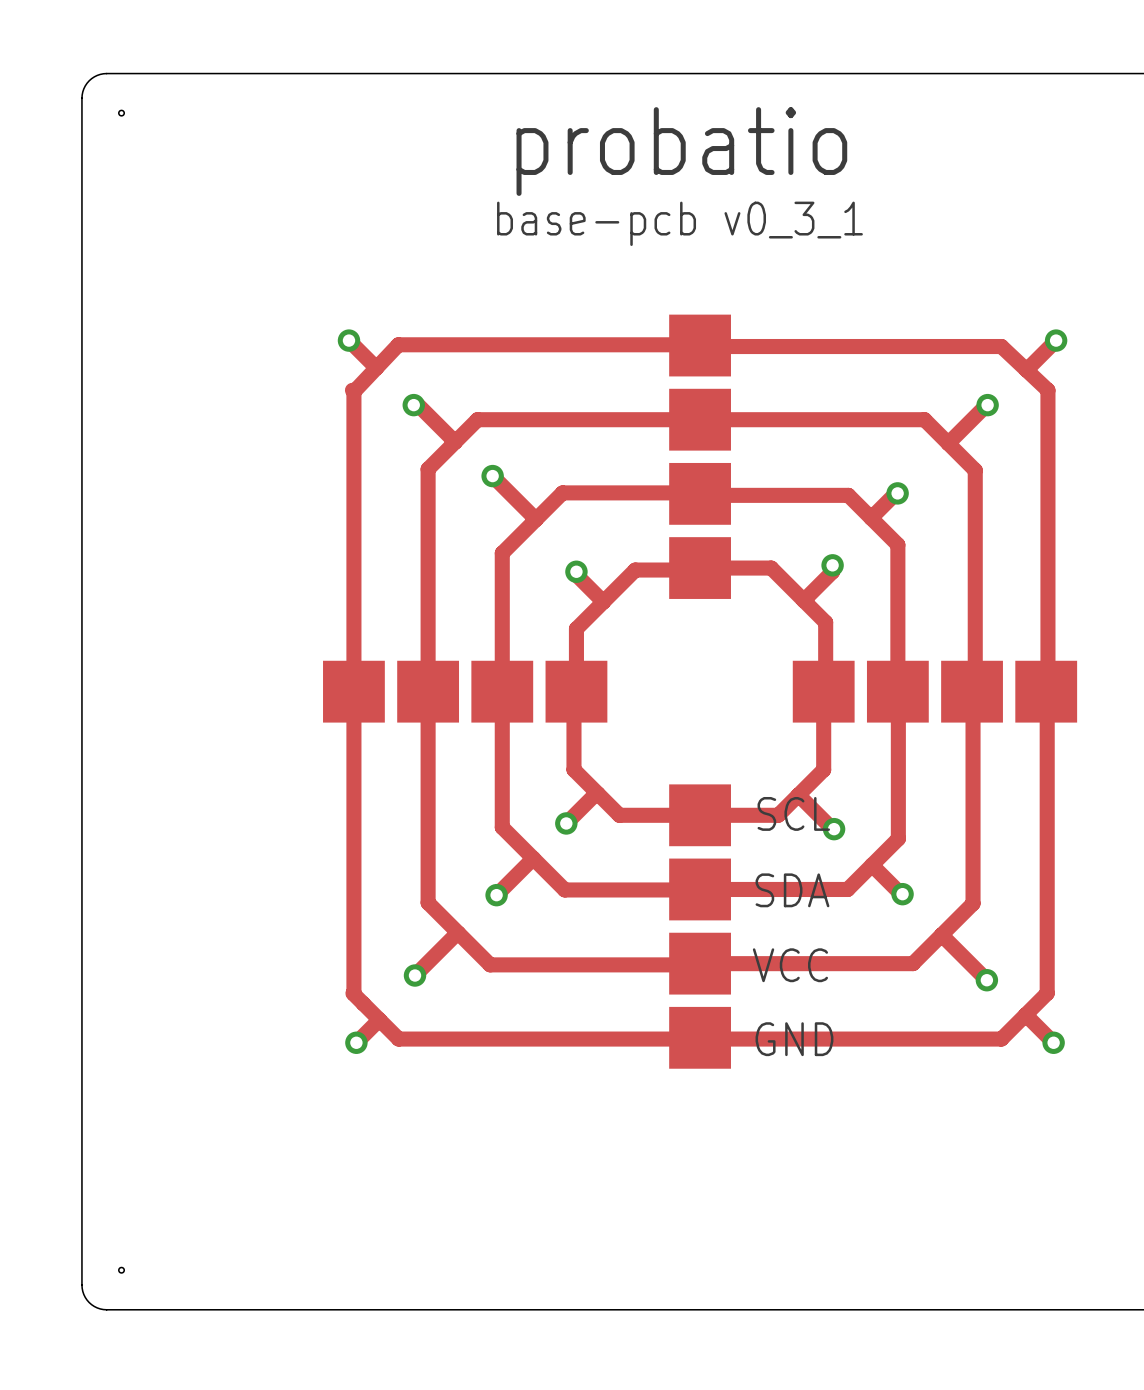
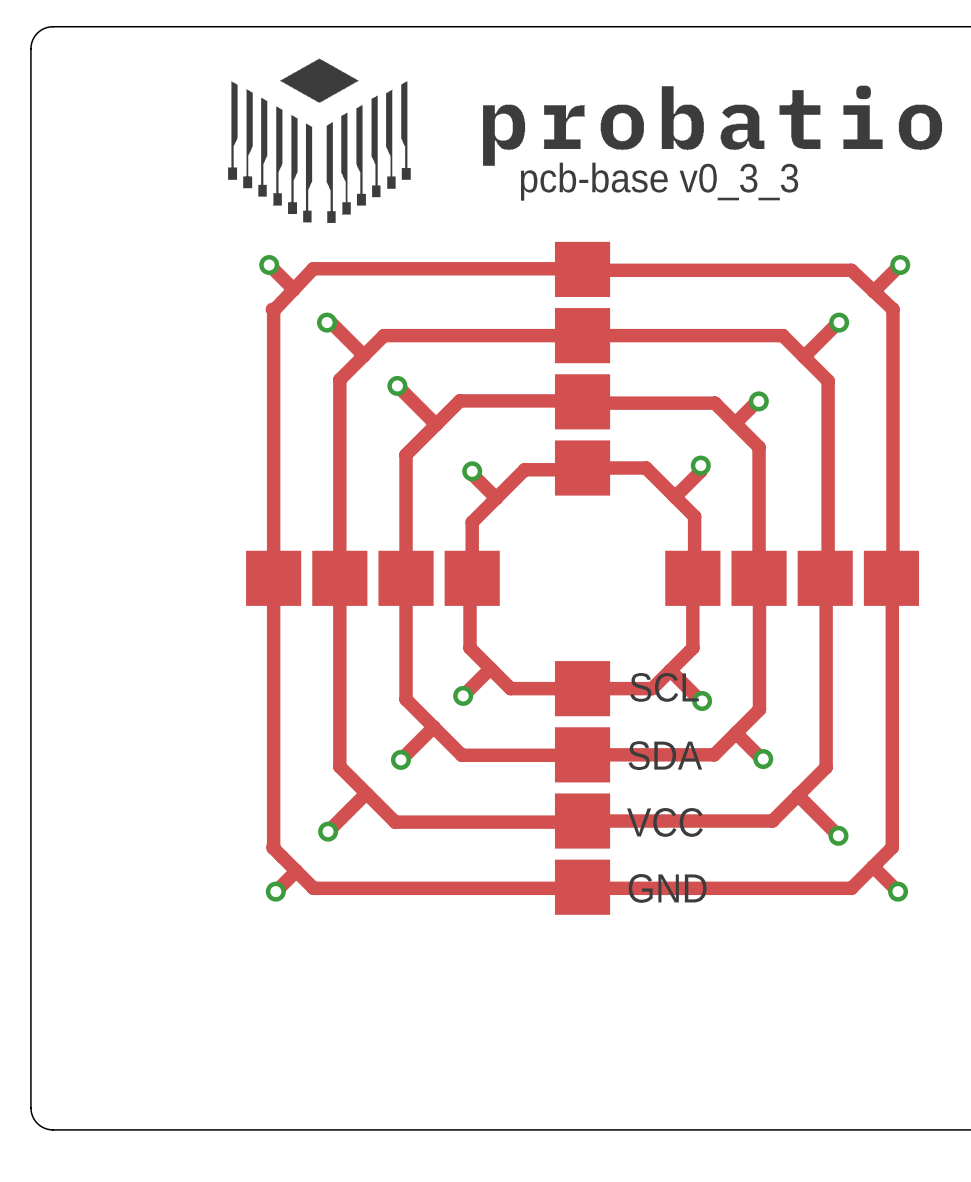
drawing: none -> [228, 58, 943, 223]
hole: (121, 113) -> none
text: probatio (681, 151) -> none
text: base-pcb v0_3_1 (679, 223) -> pcb-base v0_3_3 (659, 181)
hole: (121, 1270) -> none

